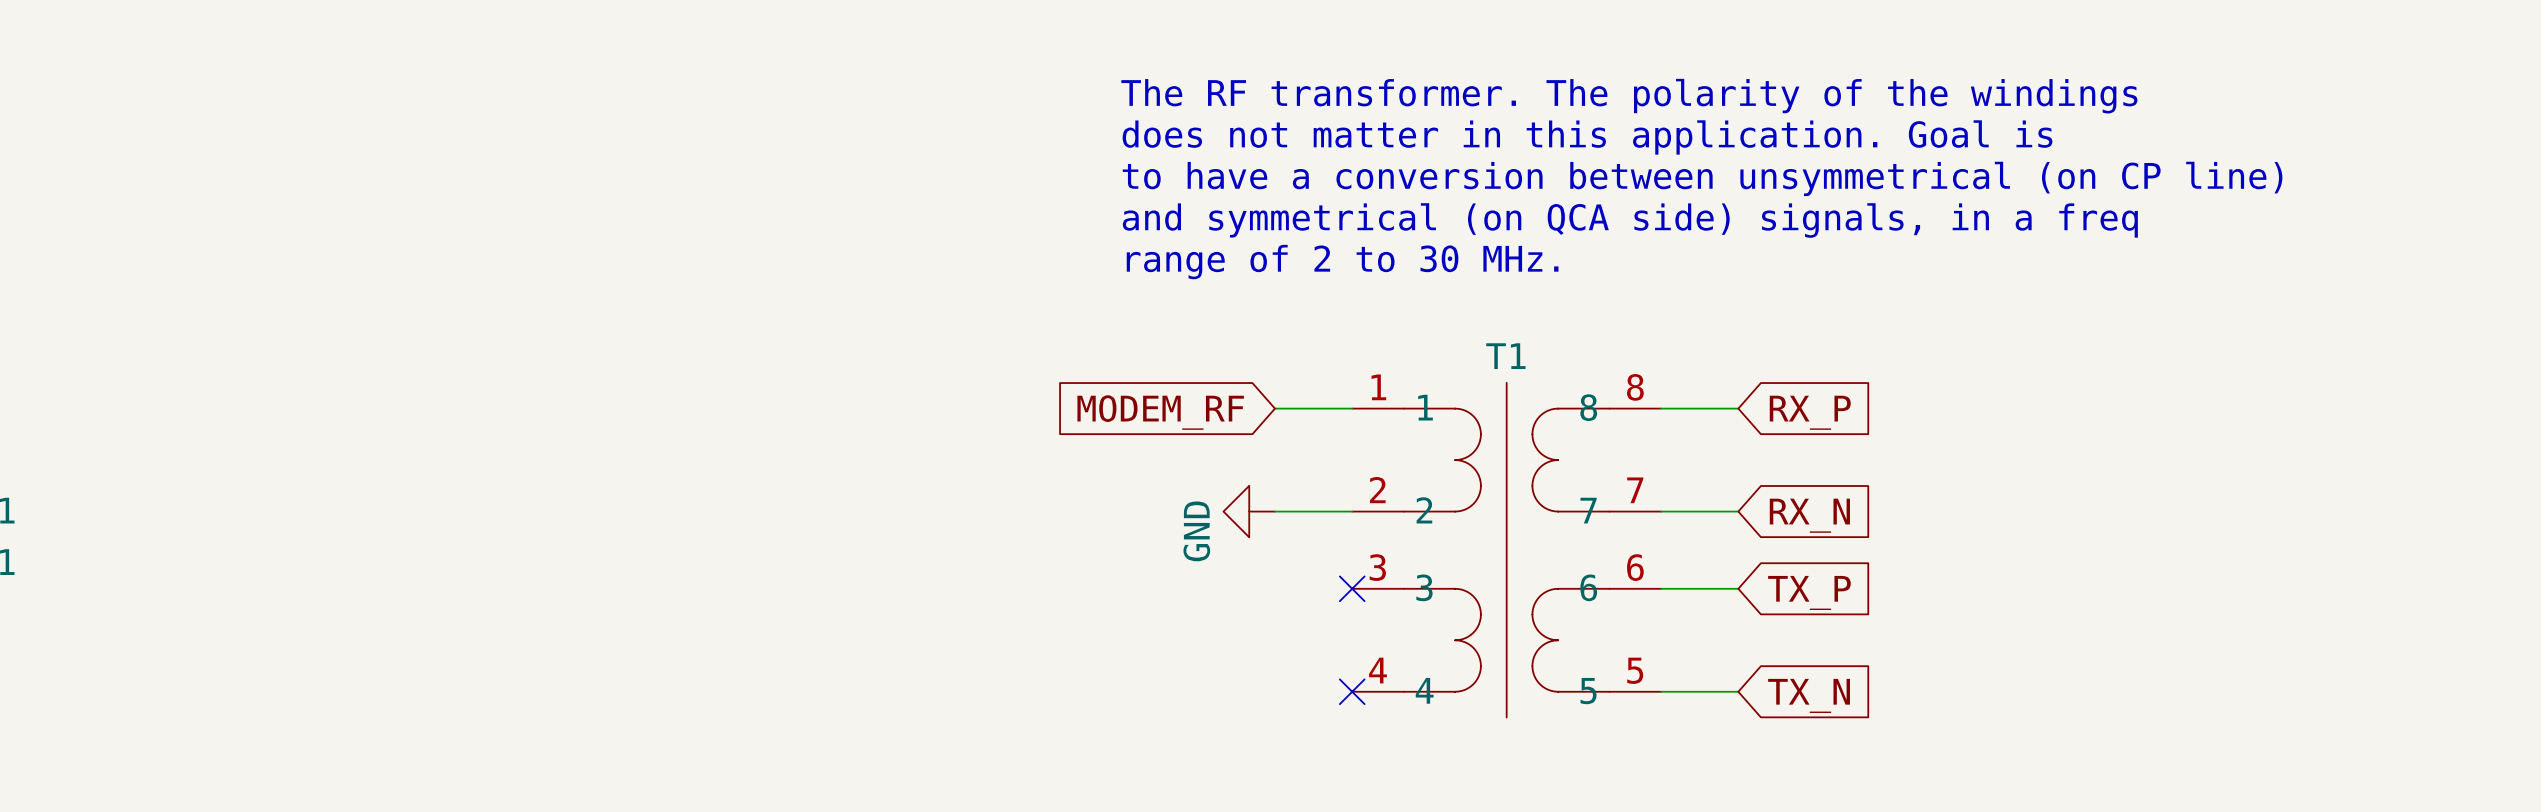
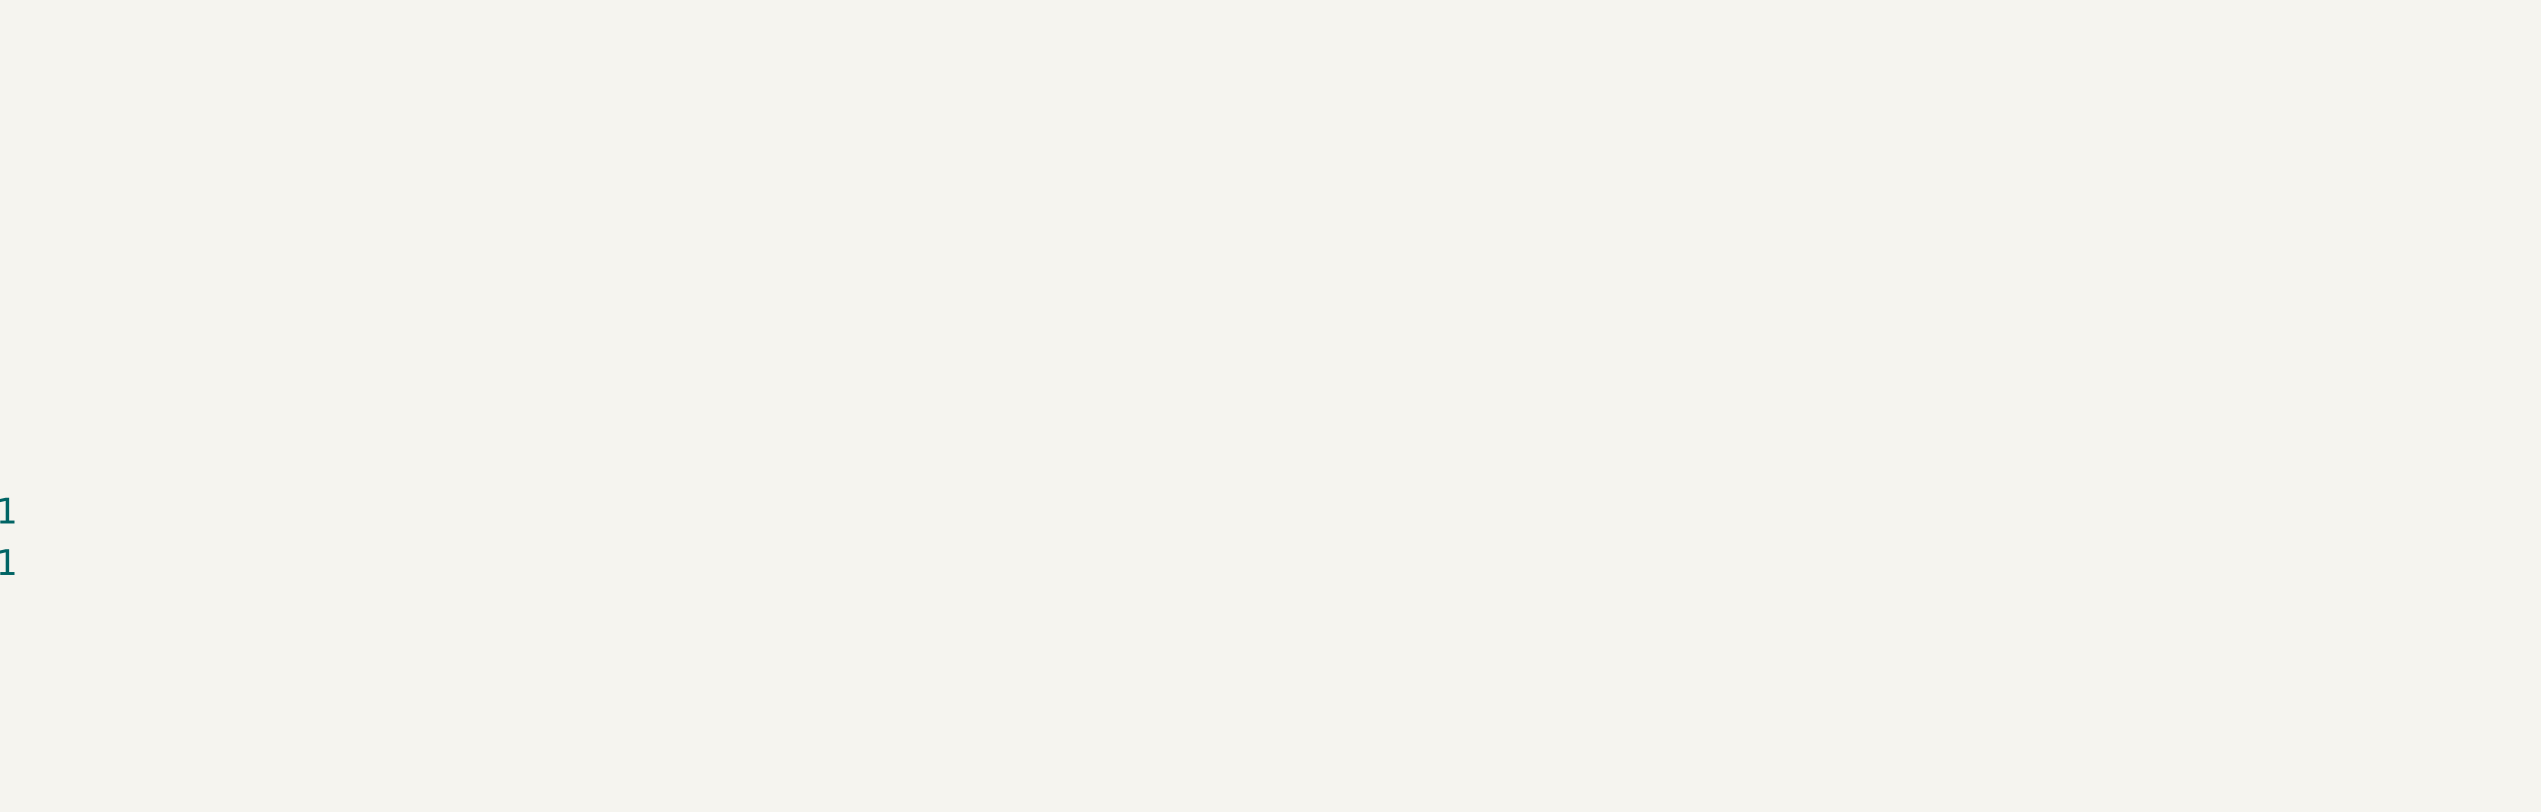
text: The RF transformer. The polarity of the windings (1629, 96) -> none
text: does not matter in this application. Goal is (1587, 137) -> none
text: to have a conversion between unsymmetrical (on CP line) (1702, 178) -> none
text: and symmetrical (on QCA side) signals, in a freq (1630, 220) -> none
text: range of 2 to 30 MHz. (1342, 262) -> none
wire: (1274, 408) (1352, 408) -> none
wire: (1661, 408) (1738, 408) -> none
global label: MODEM_RF (1160, 412) -> none
global label: RX_P (1810, 412) -> none
power symbol: GND (1249, 511) -> none
wire: (1274, 511) (1352, 511) -> none
wire: (1661, 511) (1738, 511) -> none
global label: RX_N (1809, 515) -> none
T1: (1506, 550) -> none
no-connect mark: (1352, 588) -> none
wire: (1661, 588) (1738, 588) -> none
global label: TX_P (1809, 592) -> none
no-connect mark: (1352, 691) -> none
wire: (1661, 691) (1738, 691) -> none
global label: TX_N (1809, 695) -> none

